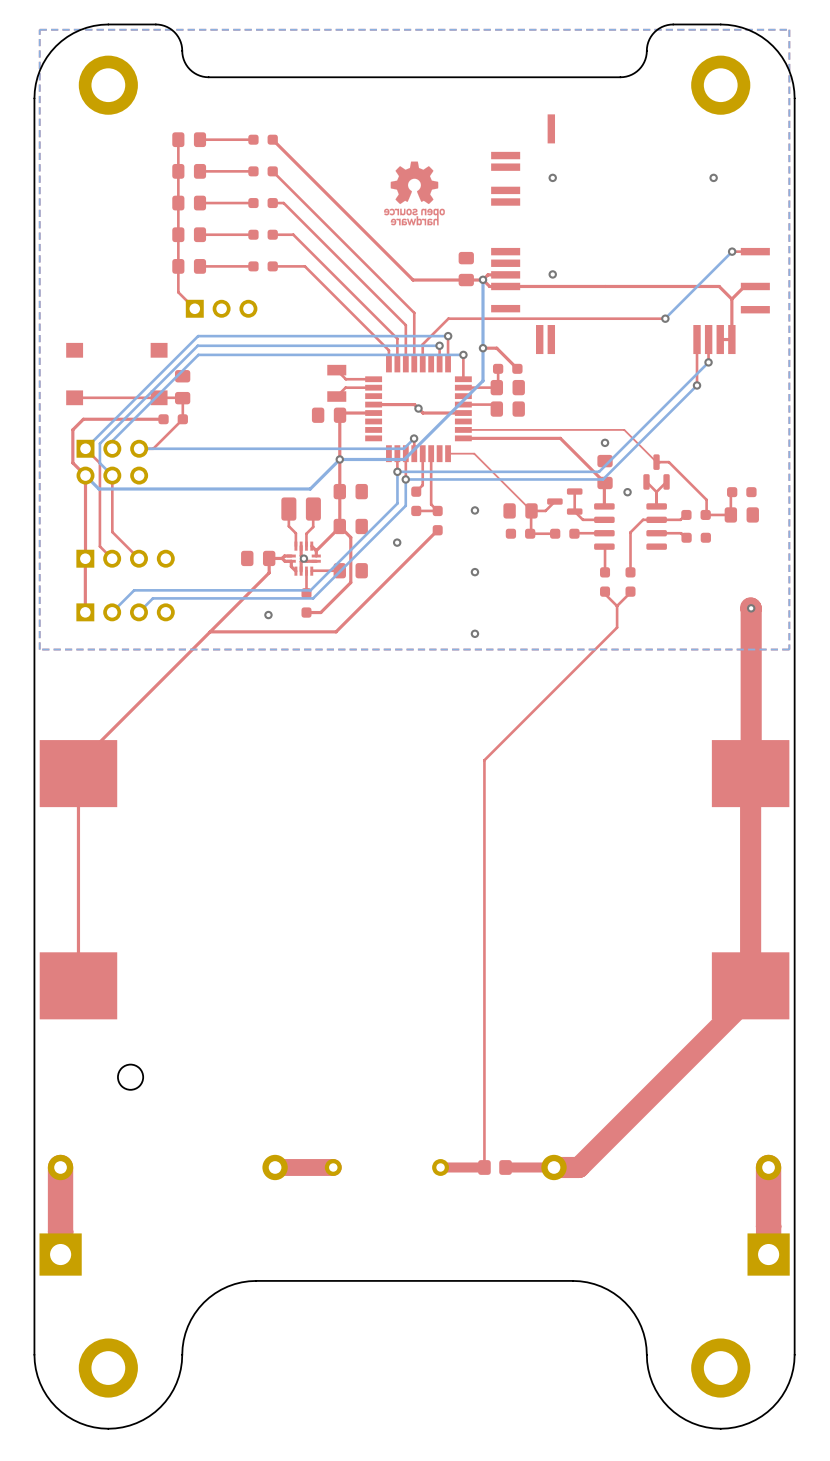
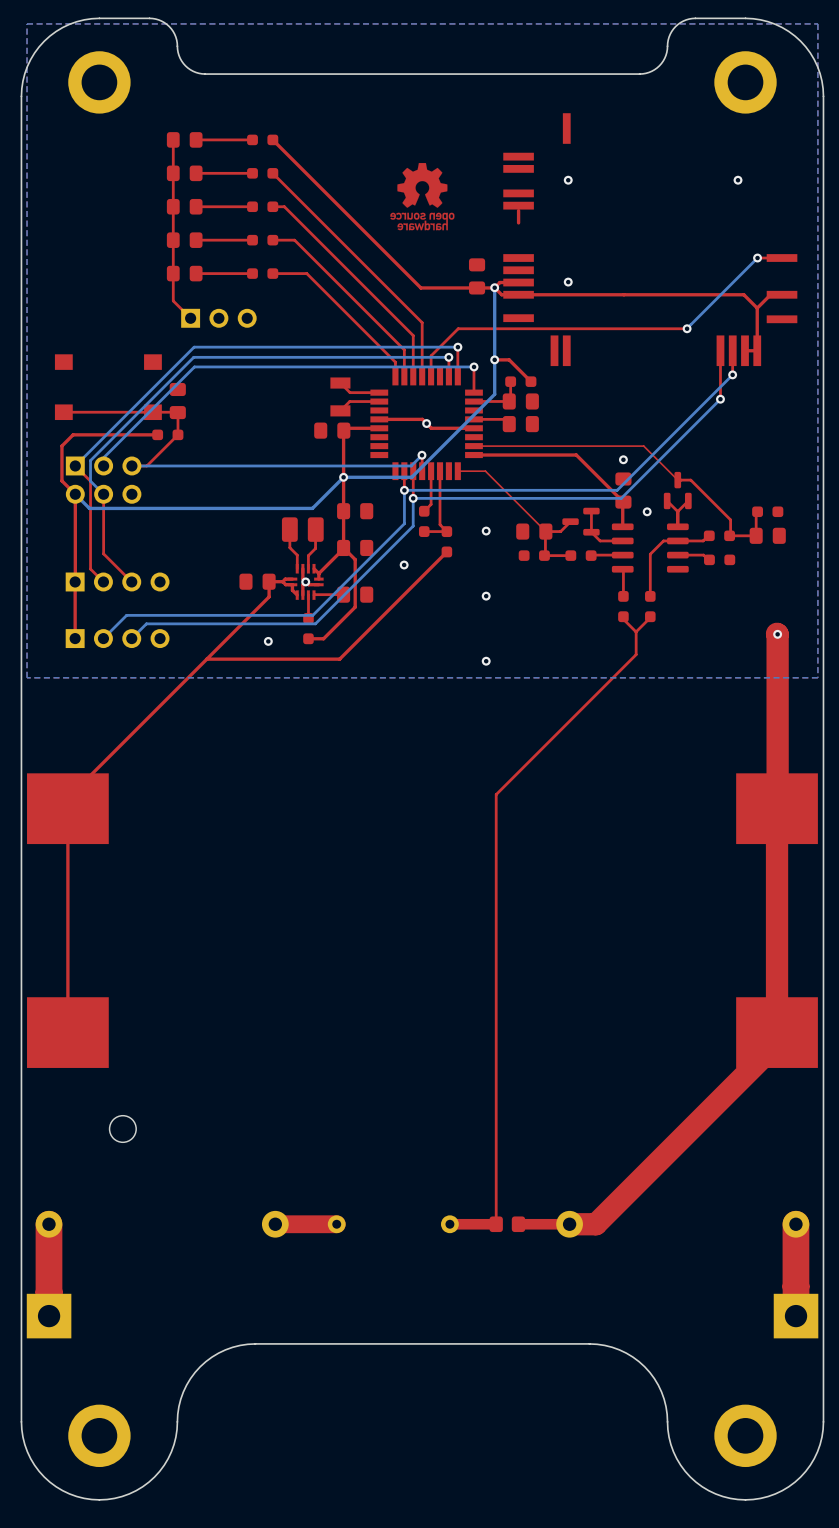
top track: none -> (518, 210) (518, 222)

